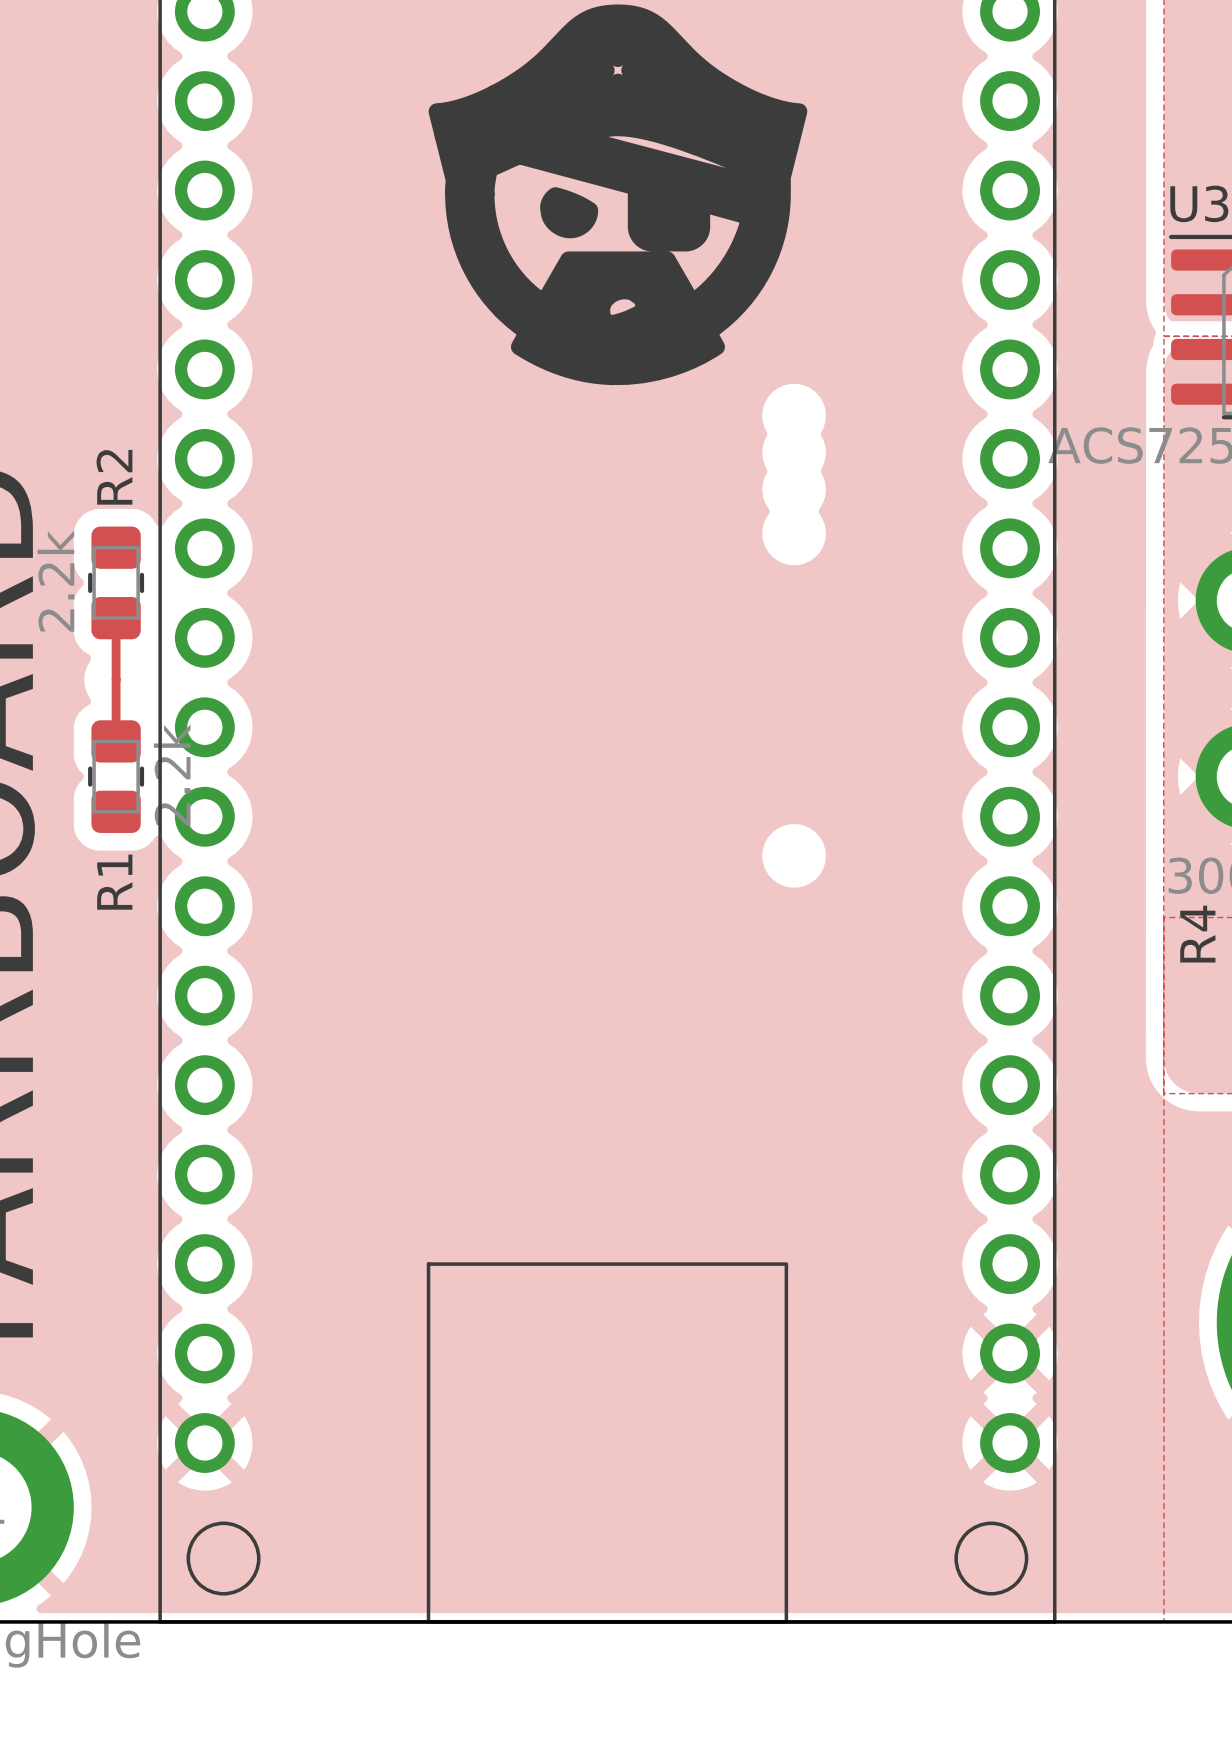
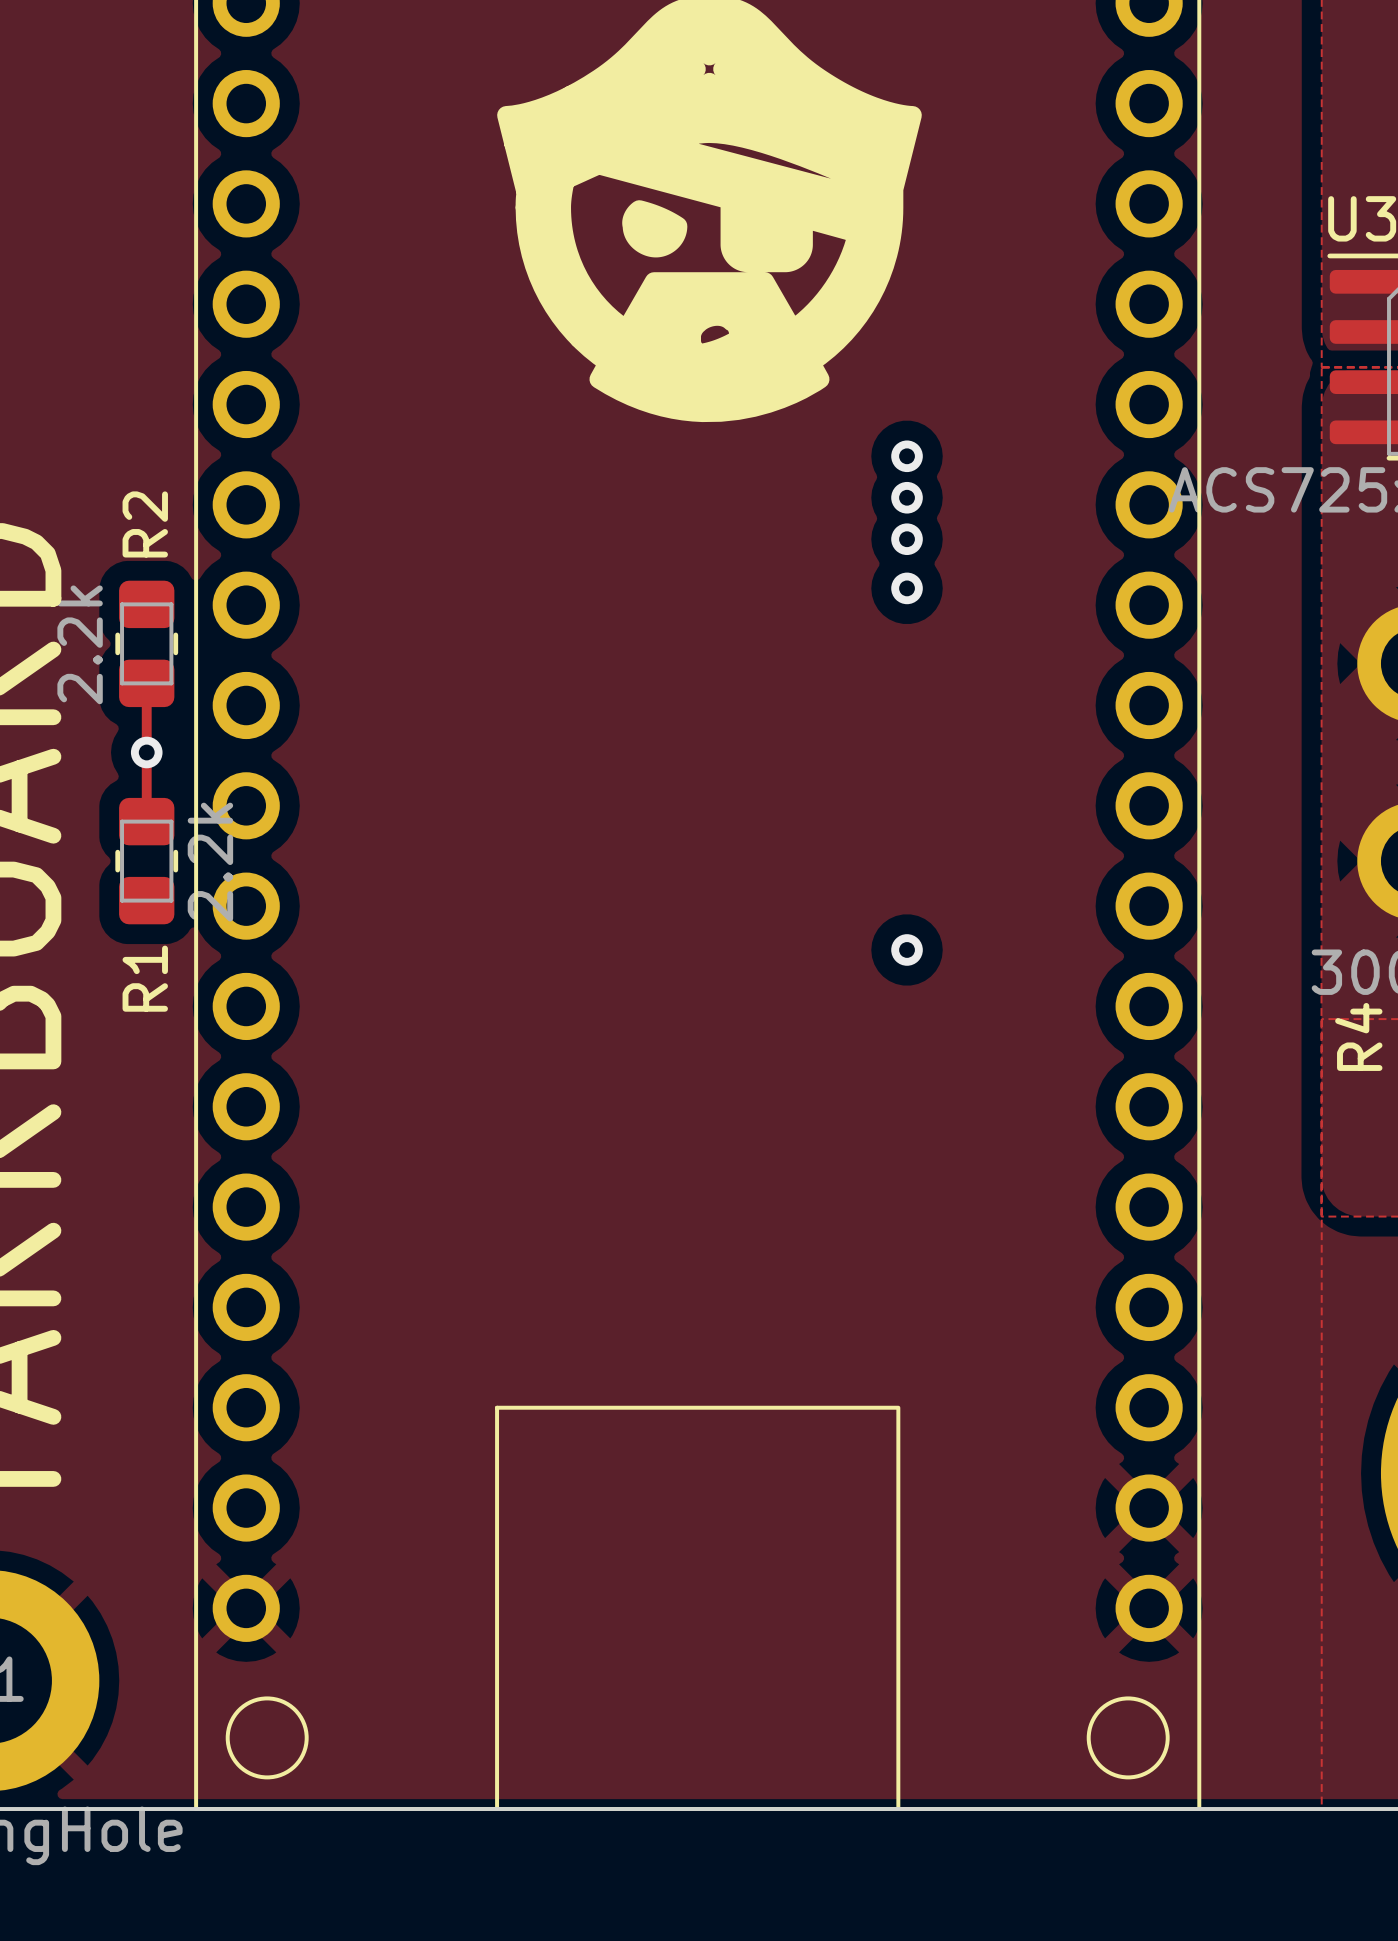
via: none -> (907, 456)
via: none -> (907, 497)
via: none -> (907, 539)
via: none -> (907, 588)
via: none -> (146, 752)
via: none -> (907, 949)

